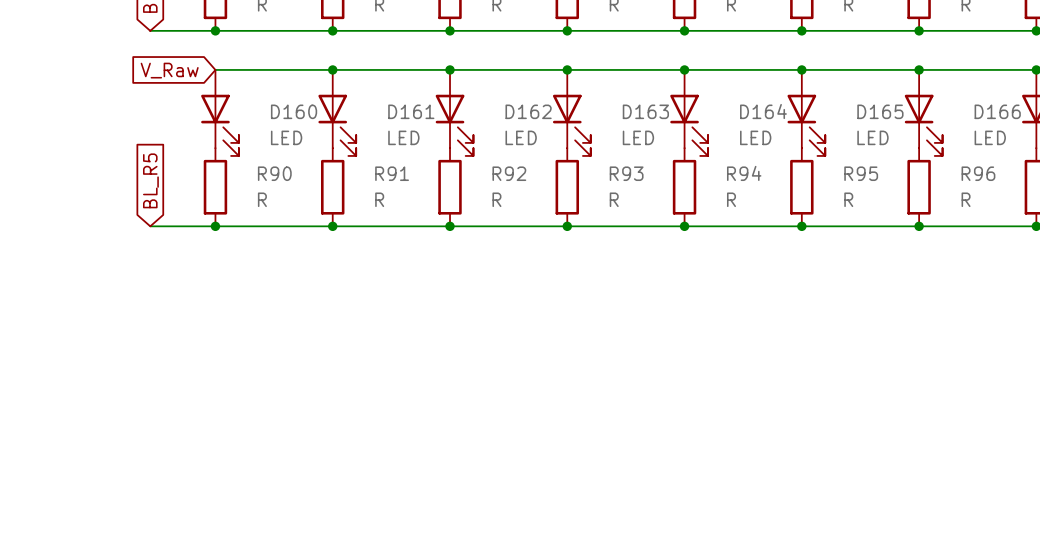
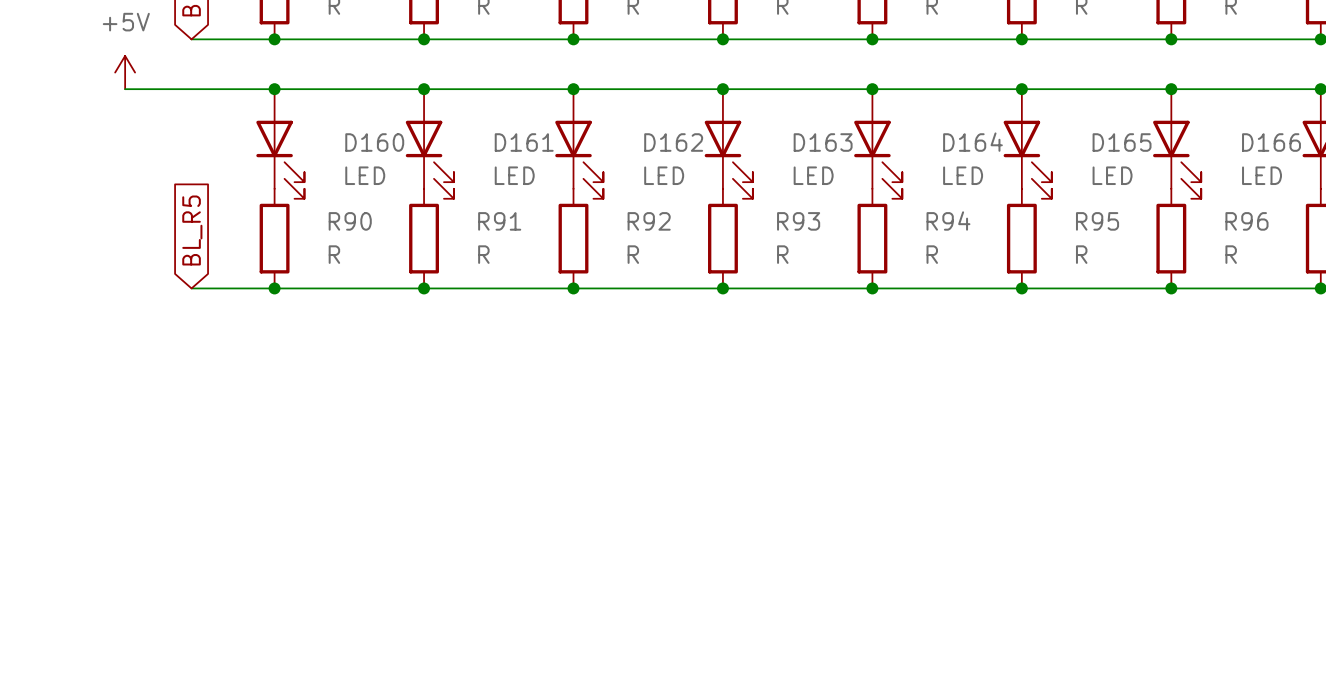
power symbol: none -> +5V (125, 72)
wire: none -> (125, 89) (274, 89)
junction: none -> (274, 89)
global label: V_Raw (169, 70) -> none

